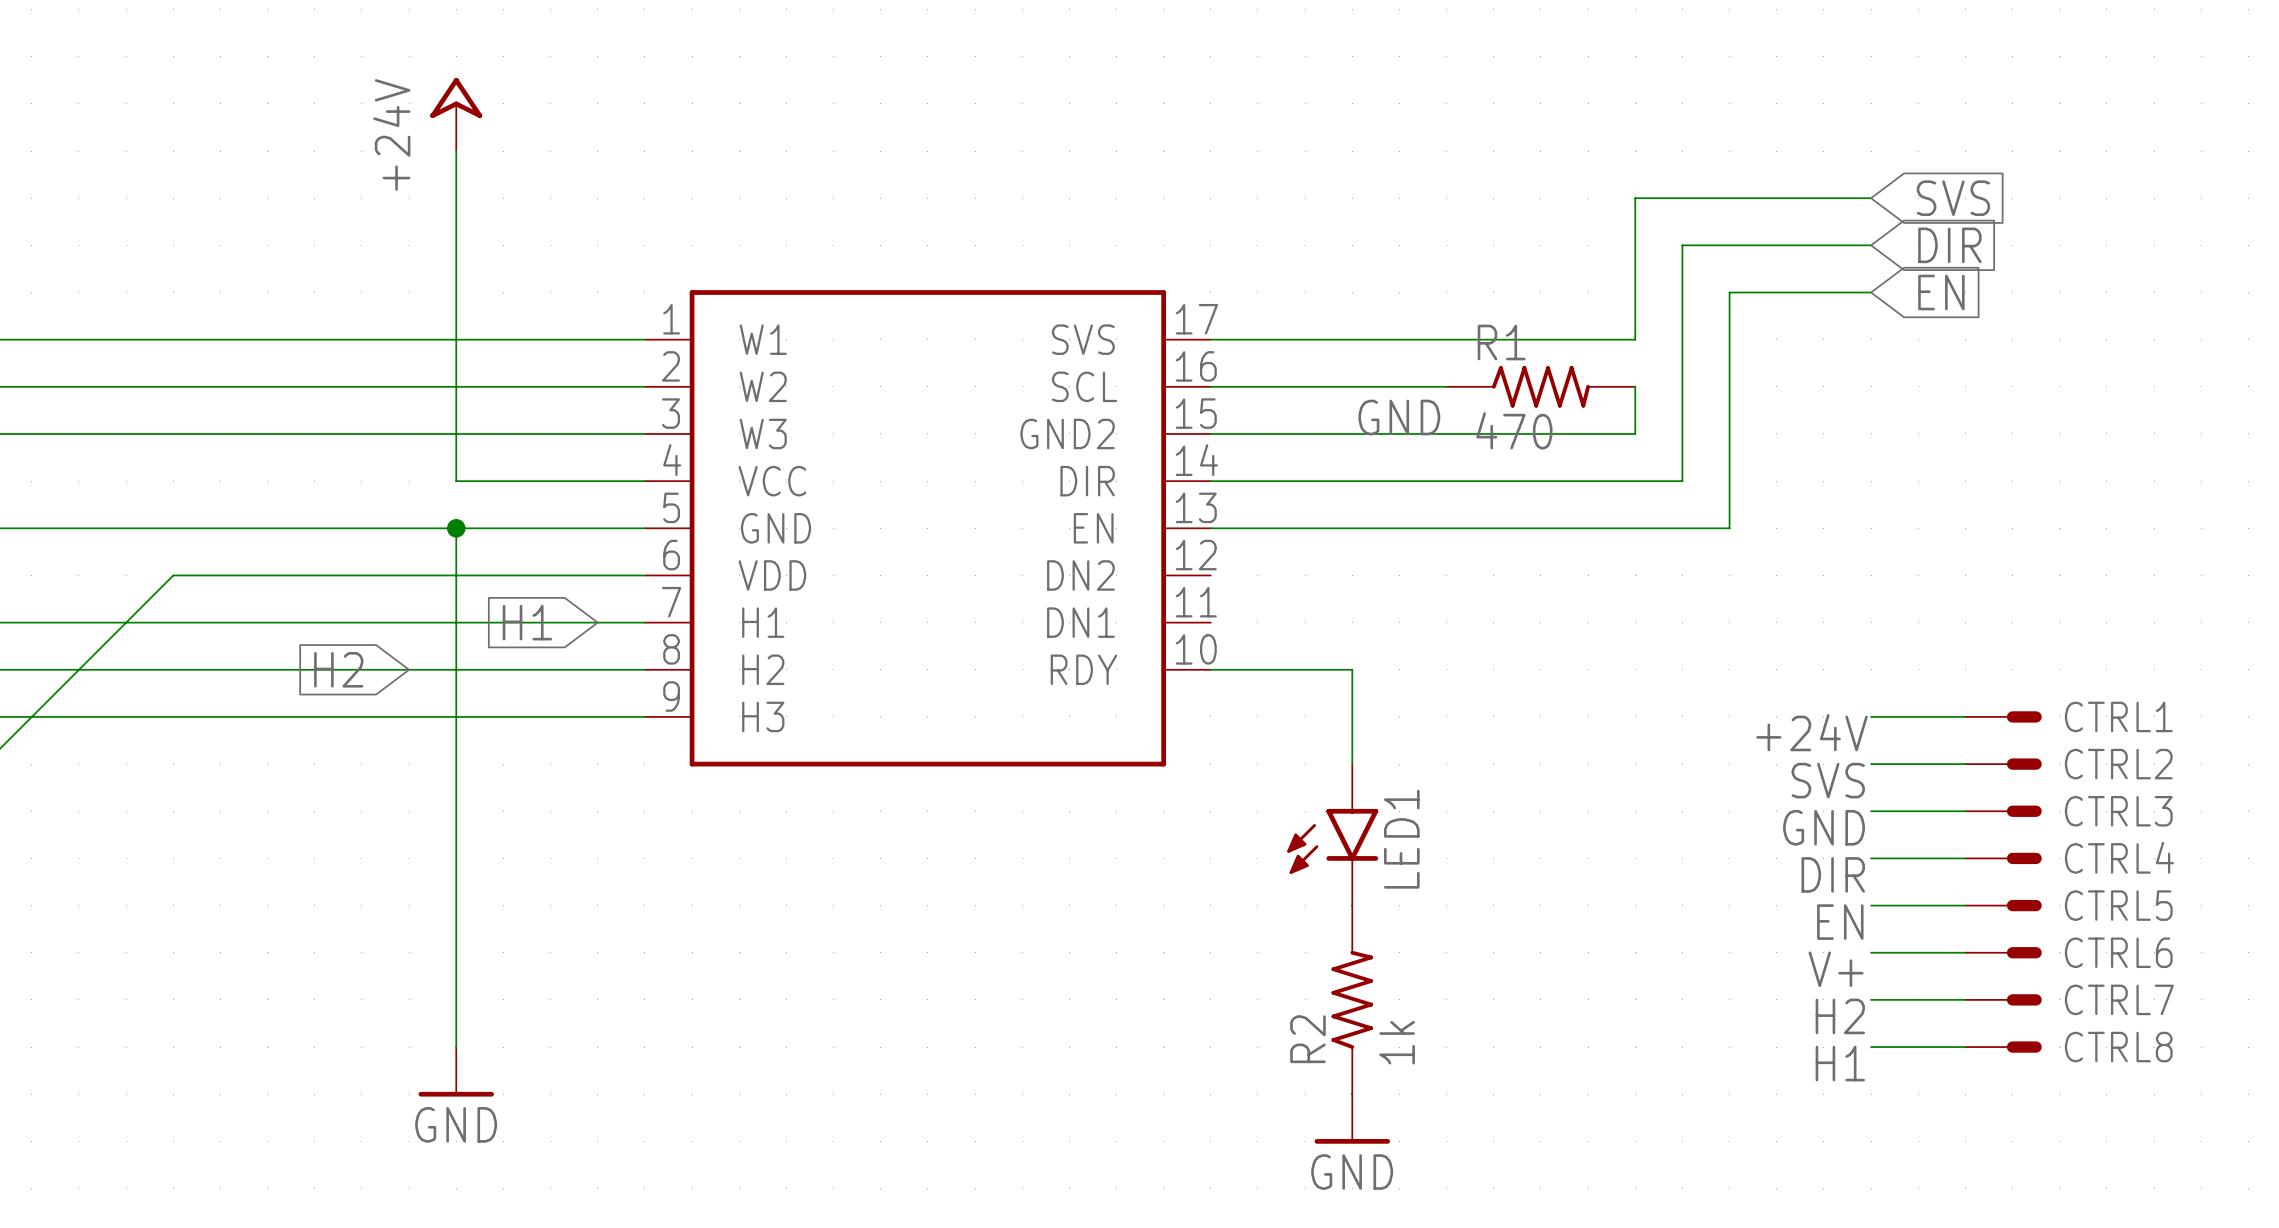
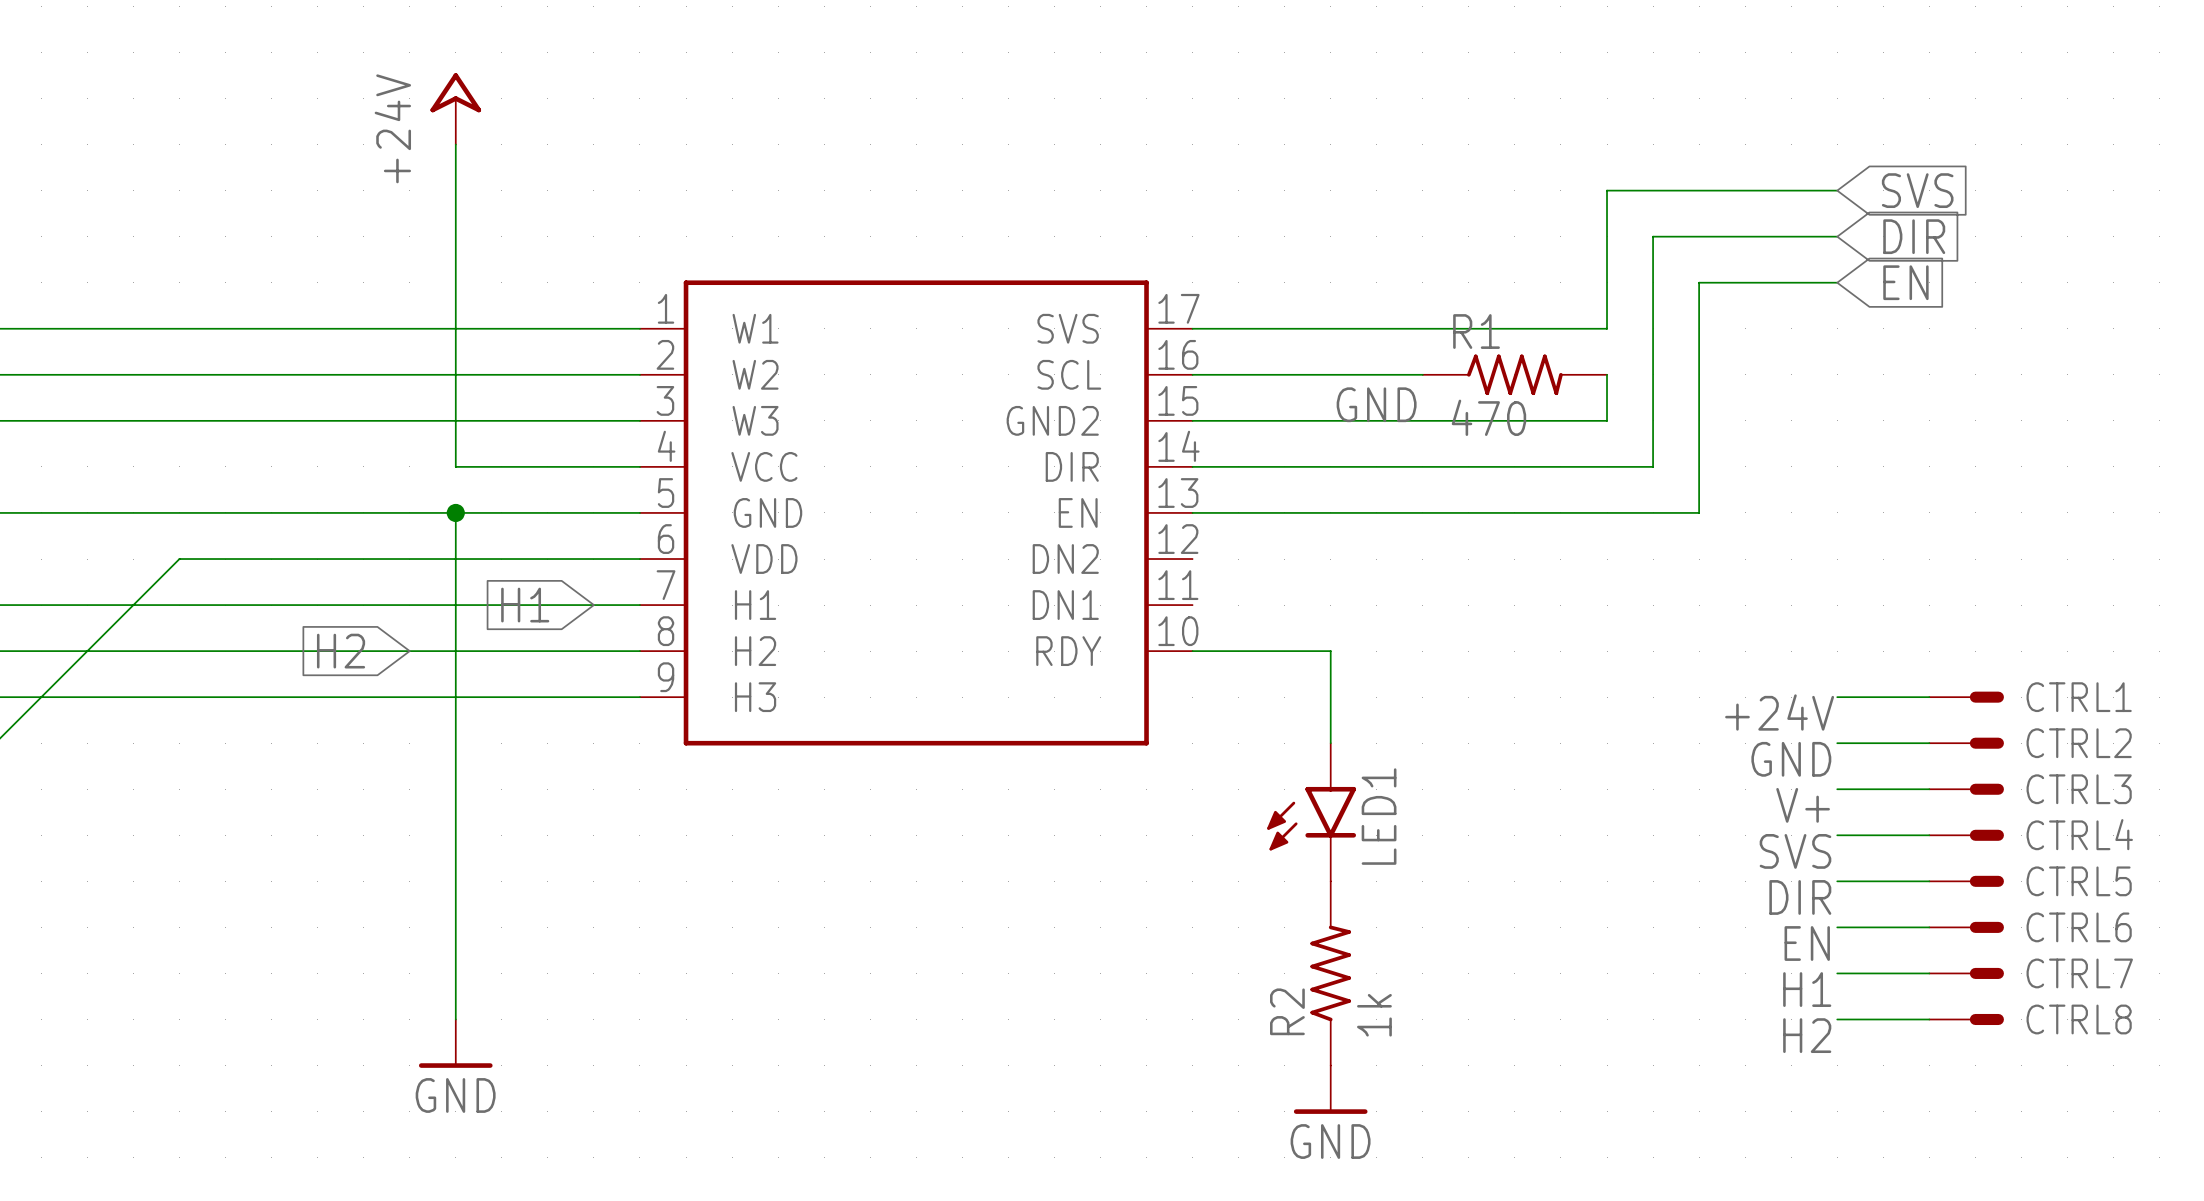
label: SVS (1828, 780) -> GND (1791, 759)
label: GND (1824, 827) -> V+ (1803, 805)
label: DIR (1833, 874) -> SVS (1795, 851)
label: EN (1840, 922) -> DIR (1800, 897)
label: V+ (1836, 969) -> EN (1807, 943)
label: H2 (1840, 1016) -> H1 (1807, 989)
label: H1 (1840, 1063) -> H2 (1807, 1035)

